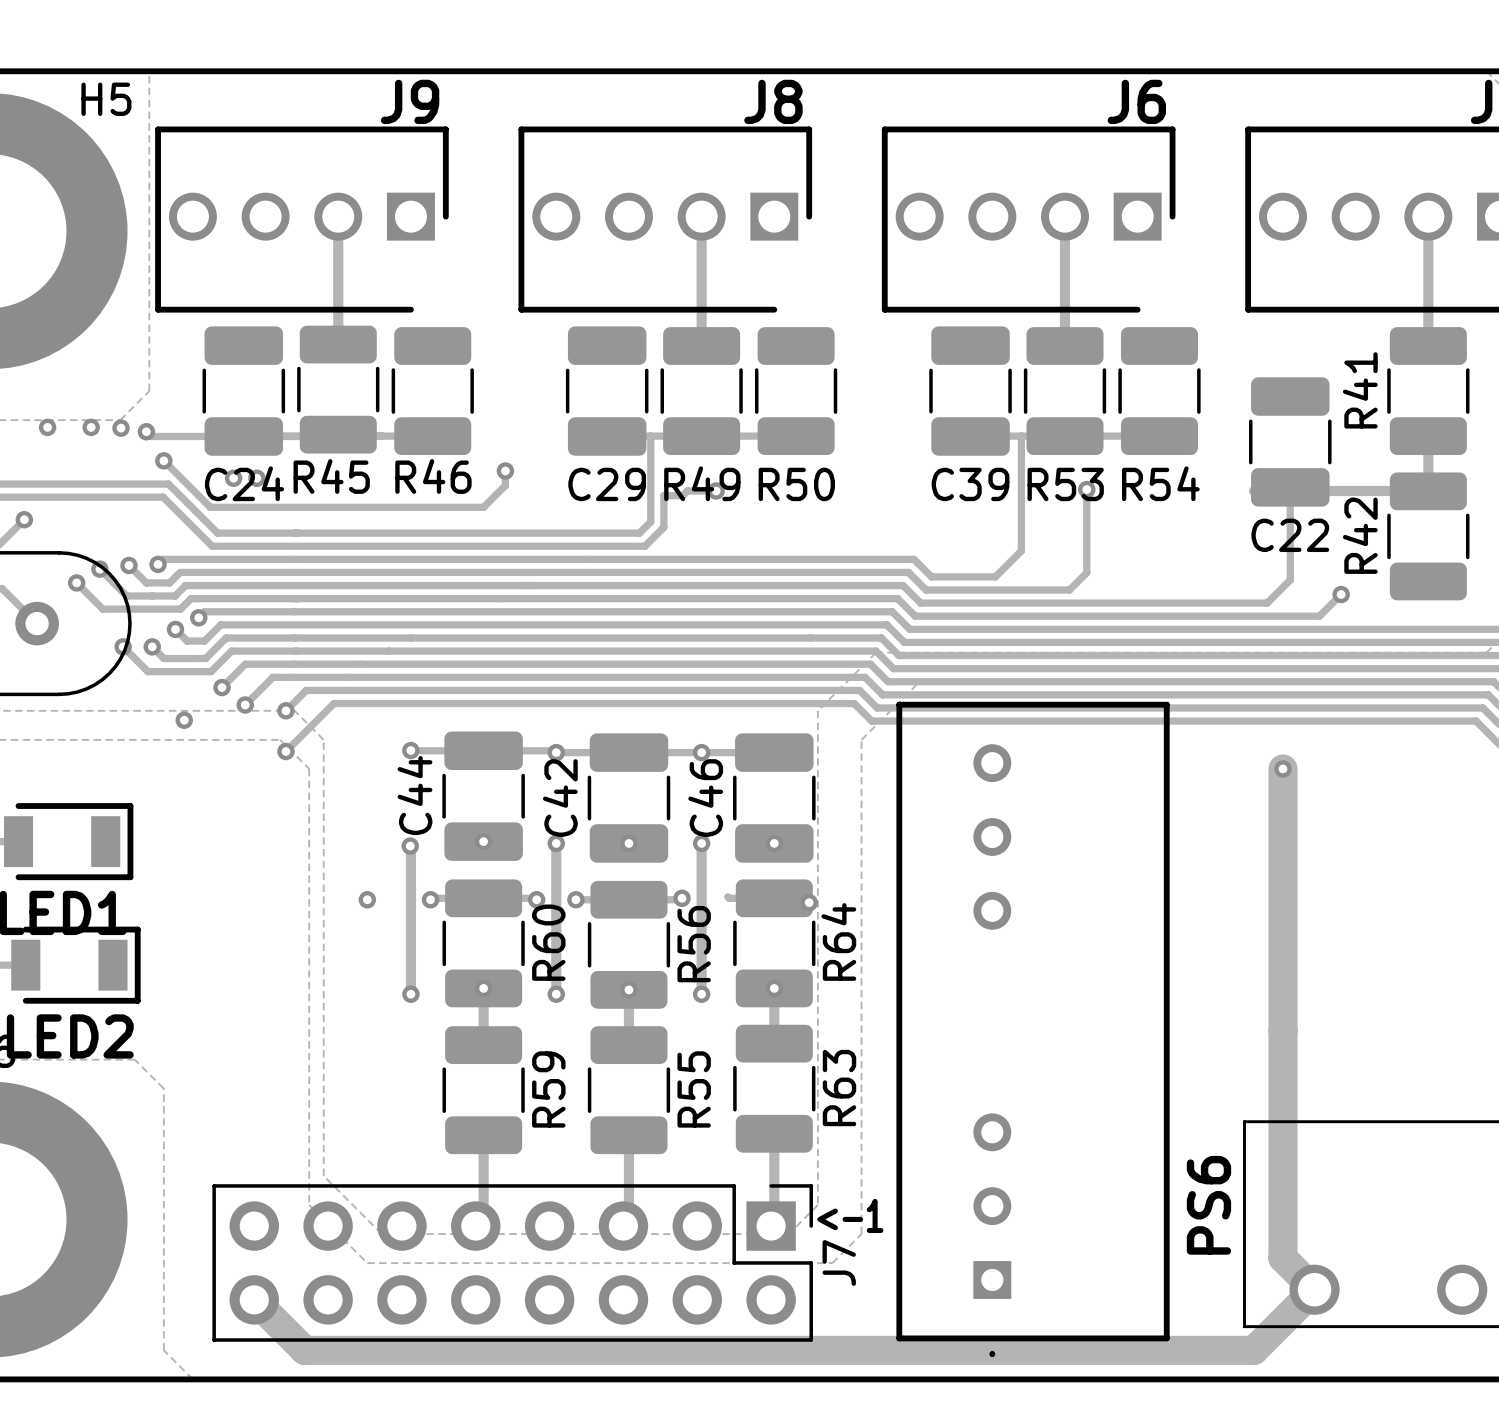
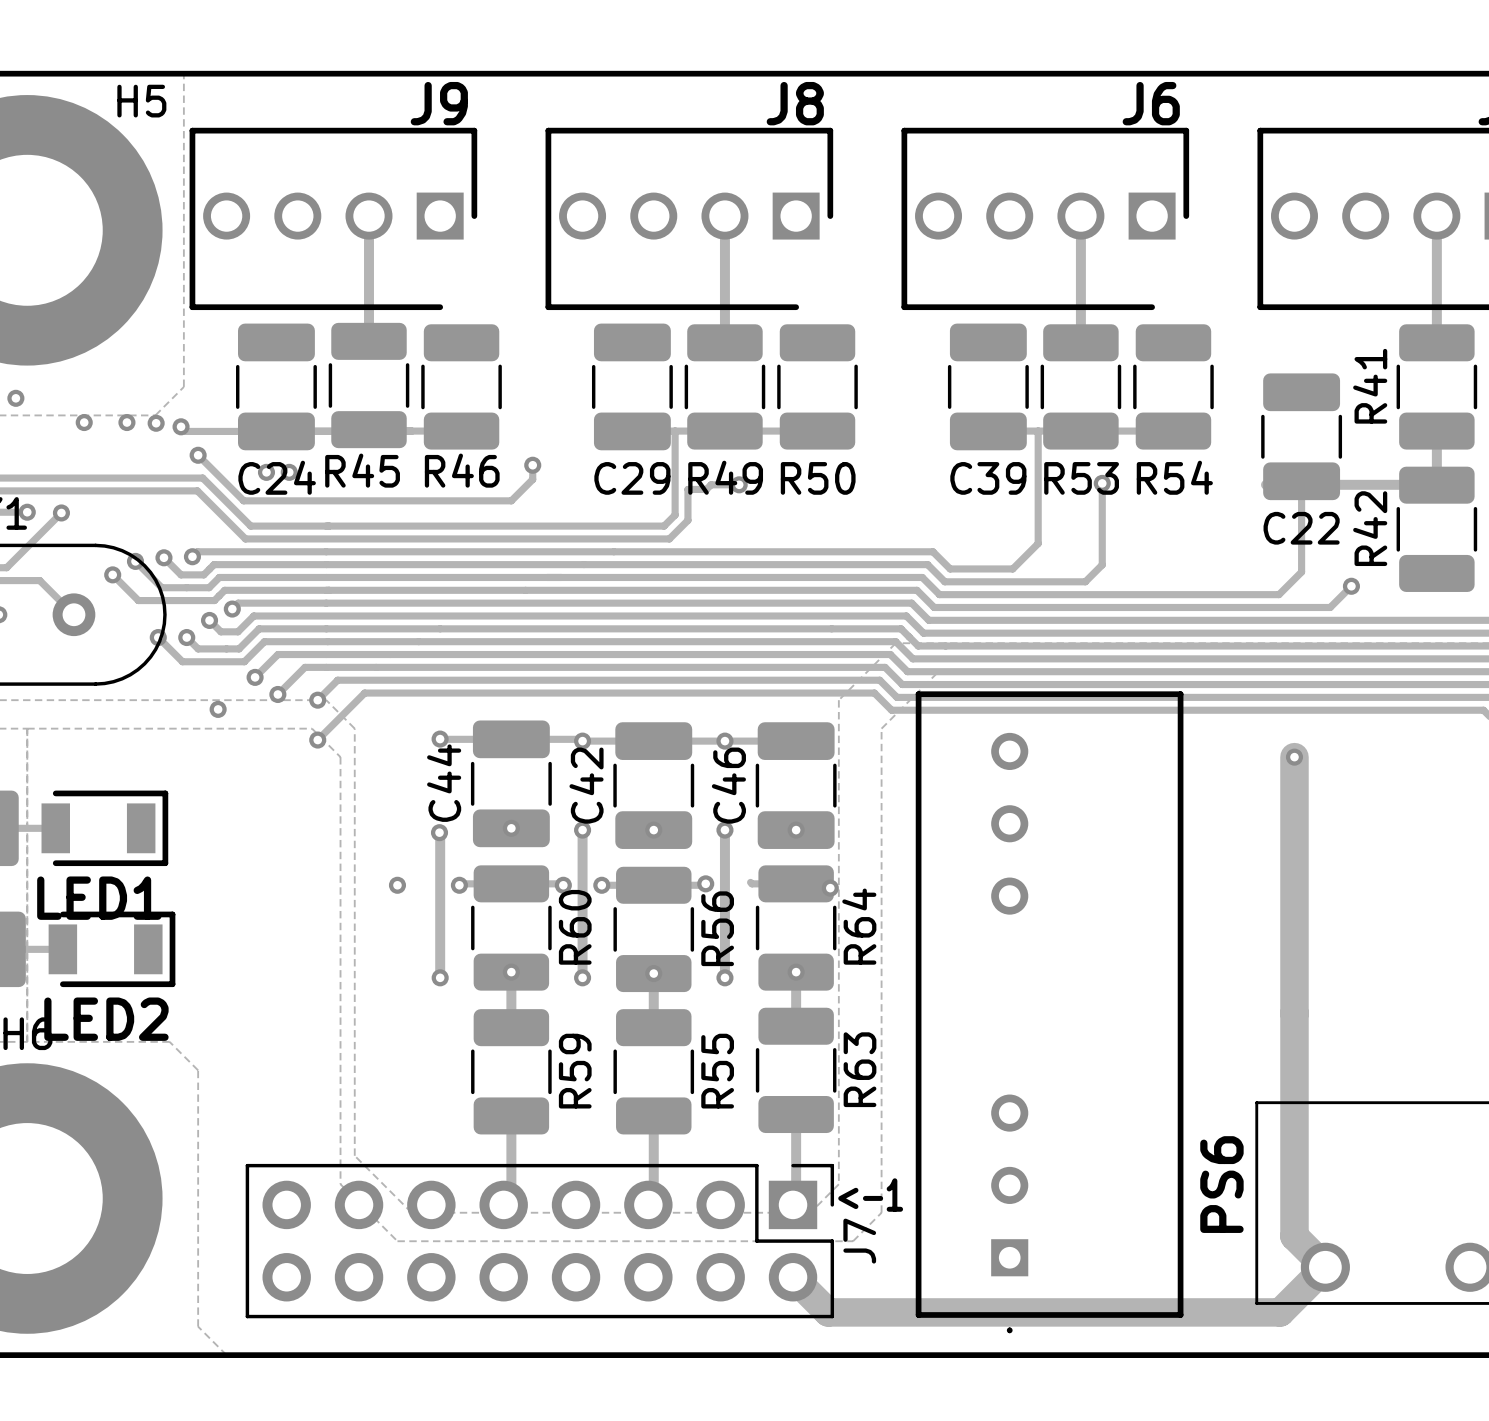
track: (254, 1299) (304, 1350) (1253, 1350) (1268, 1335) -> (793, 1277) (828, 1312) (1280, 1312)

